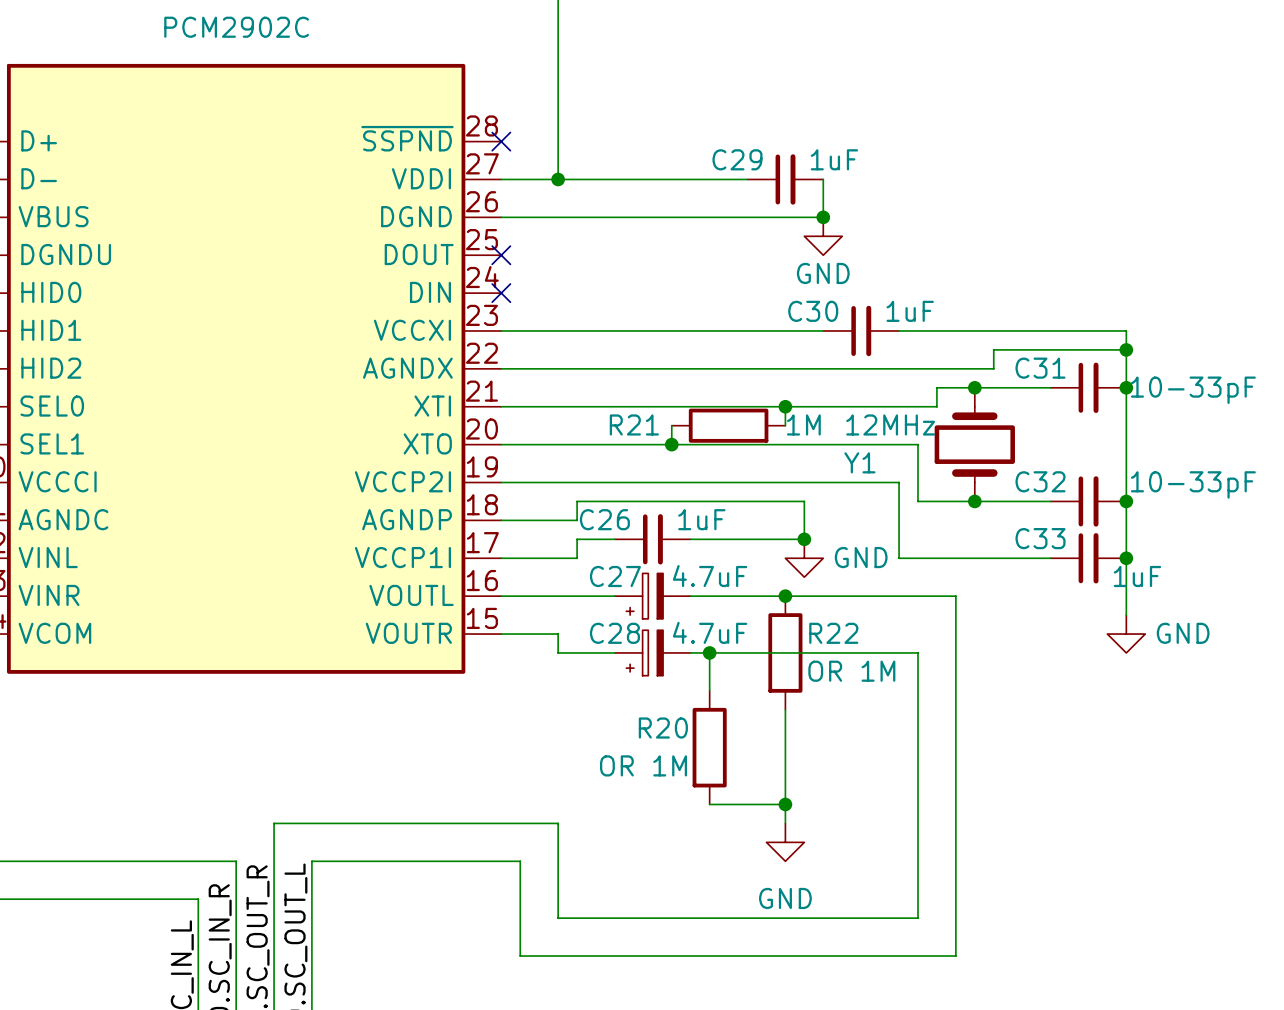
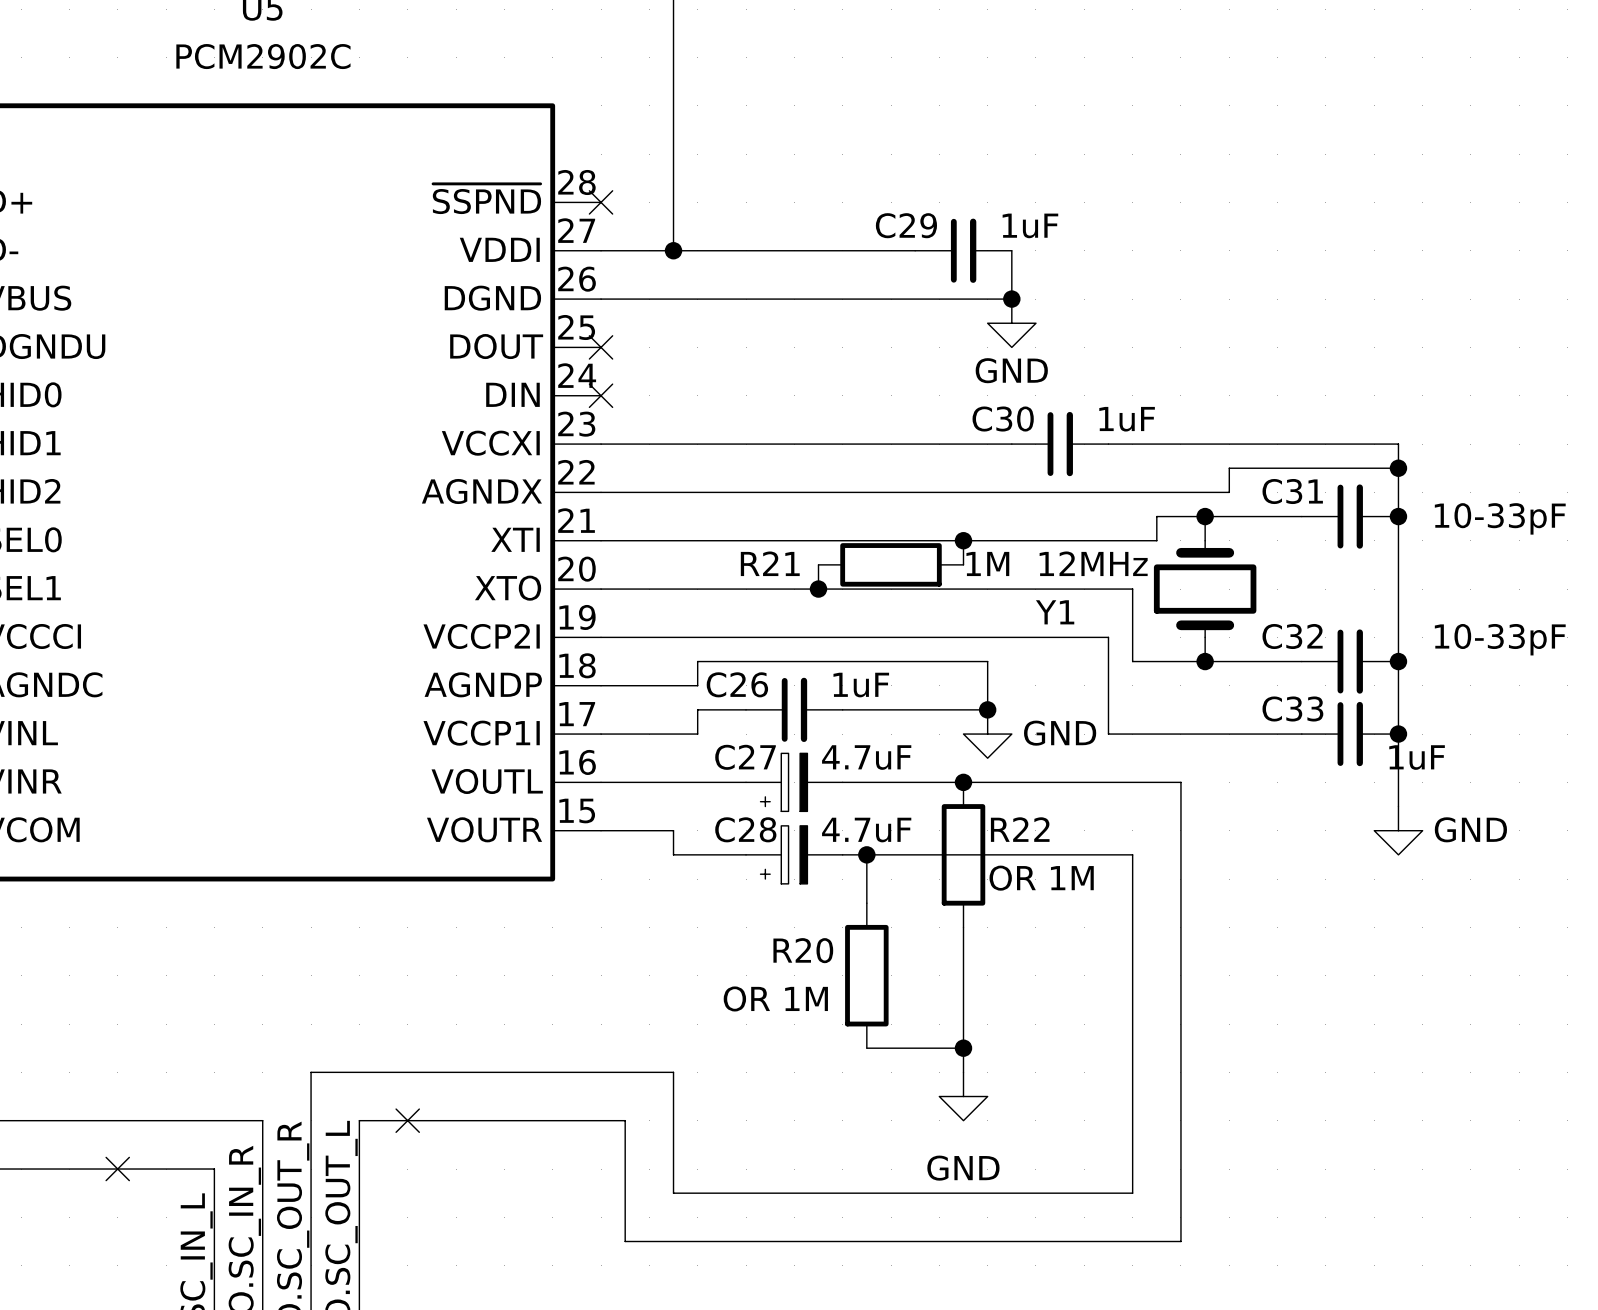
no-connect mark: none -> (407, 1120)
no-connect mark: none -> (117, 1169)

